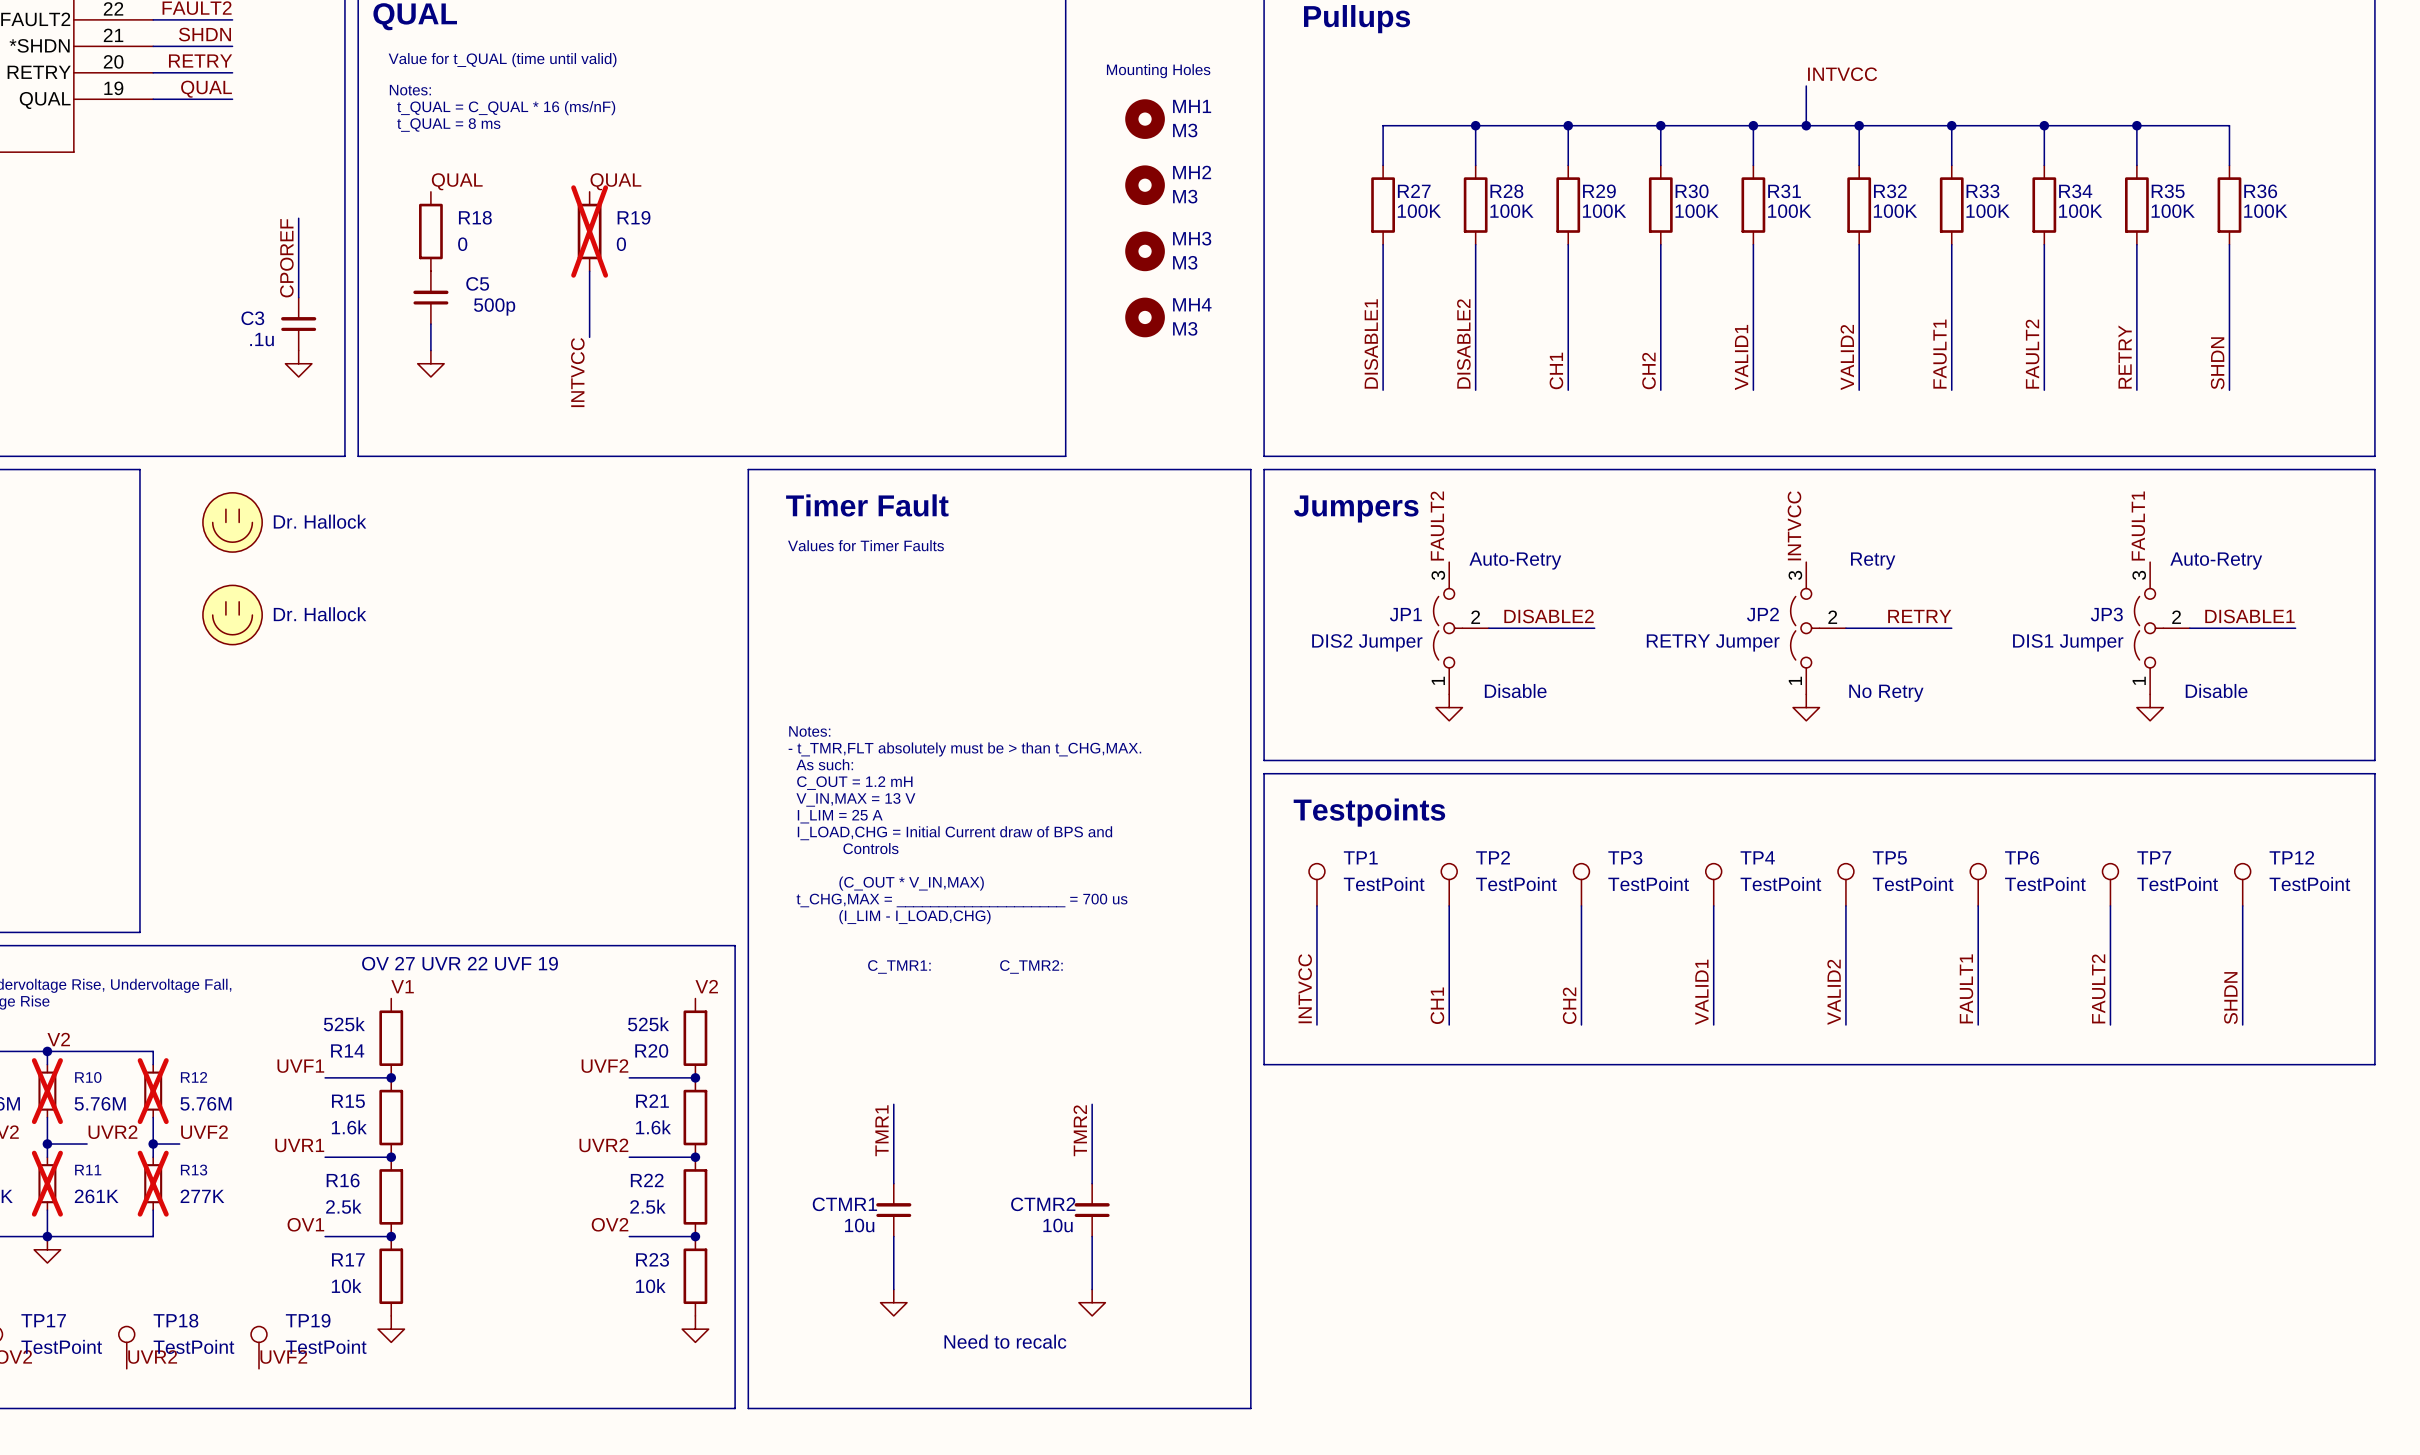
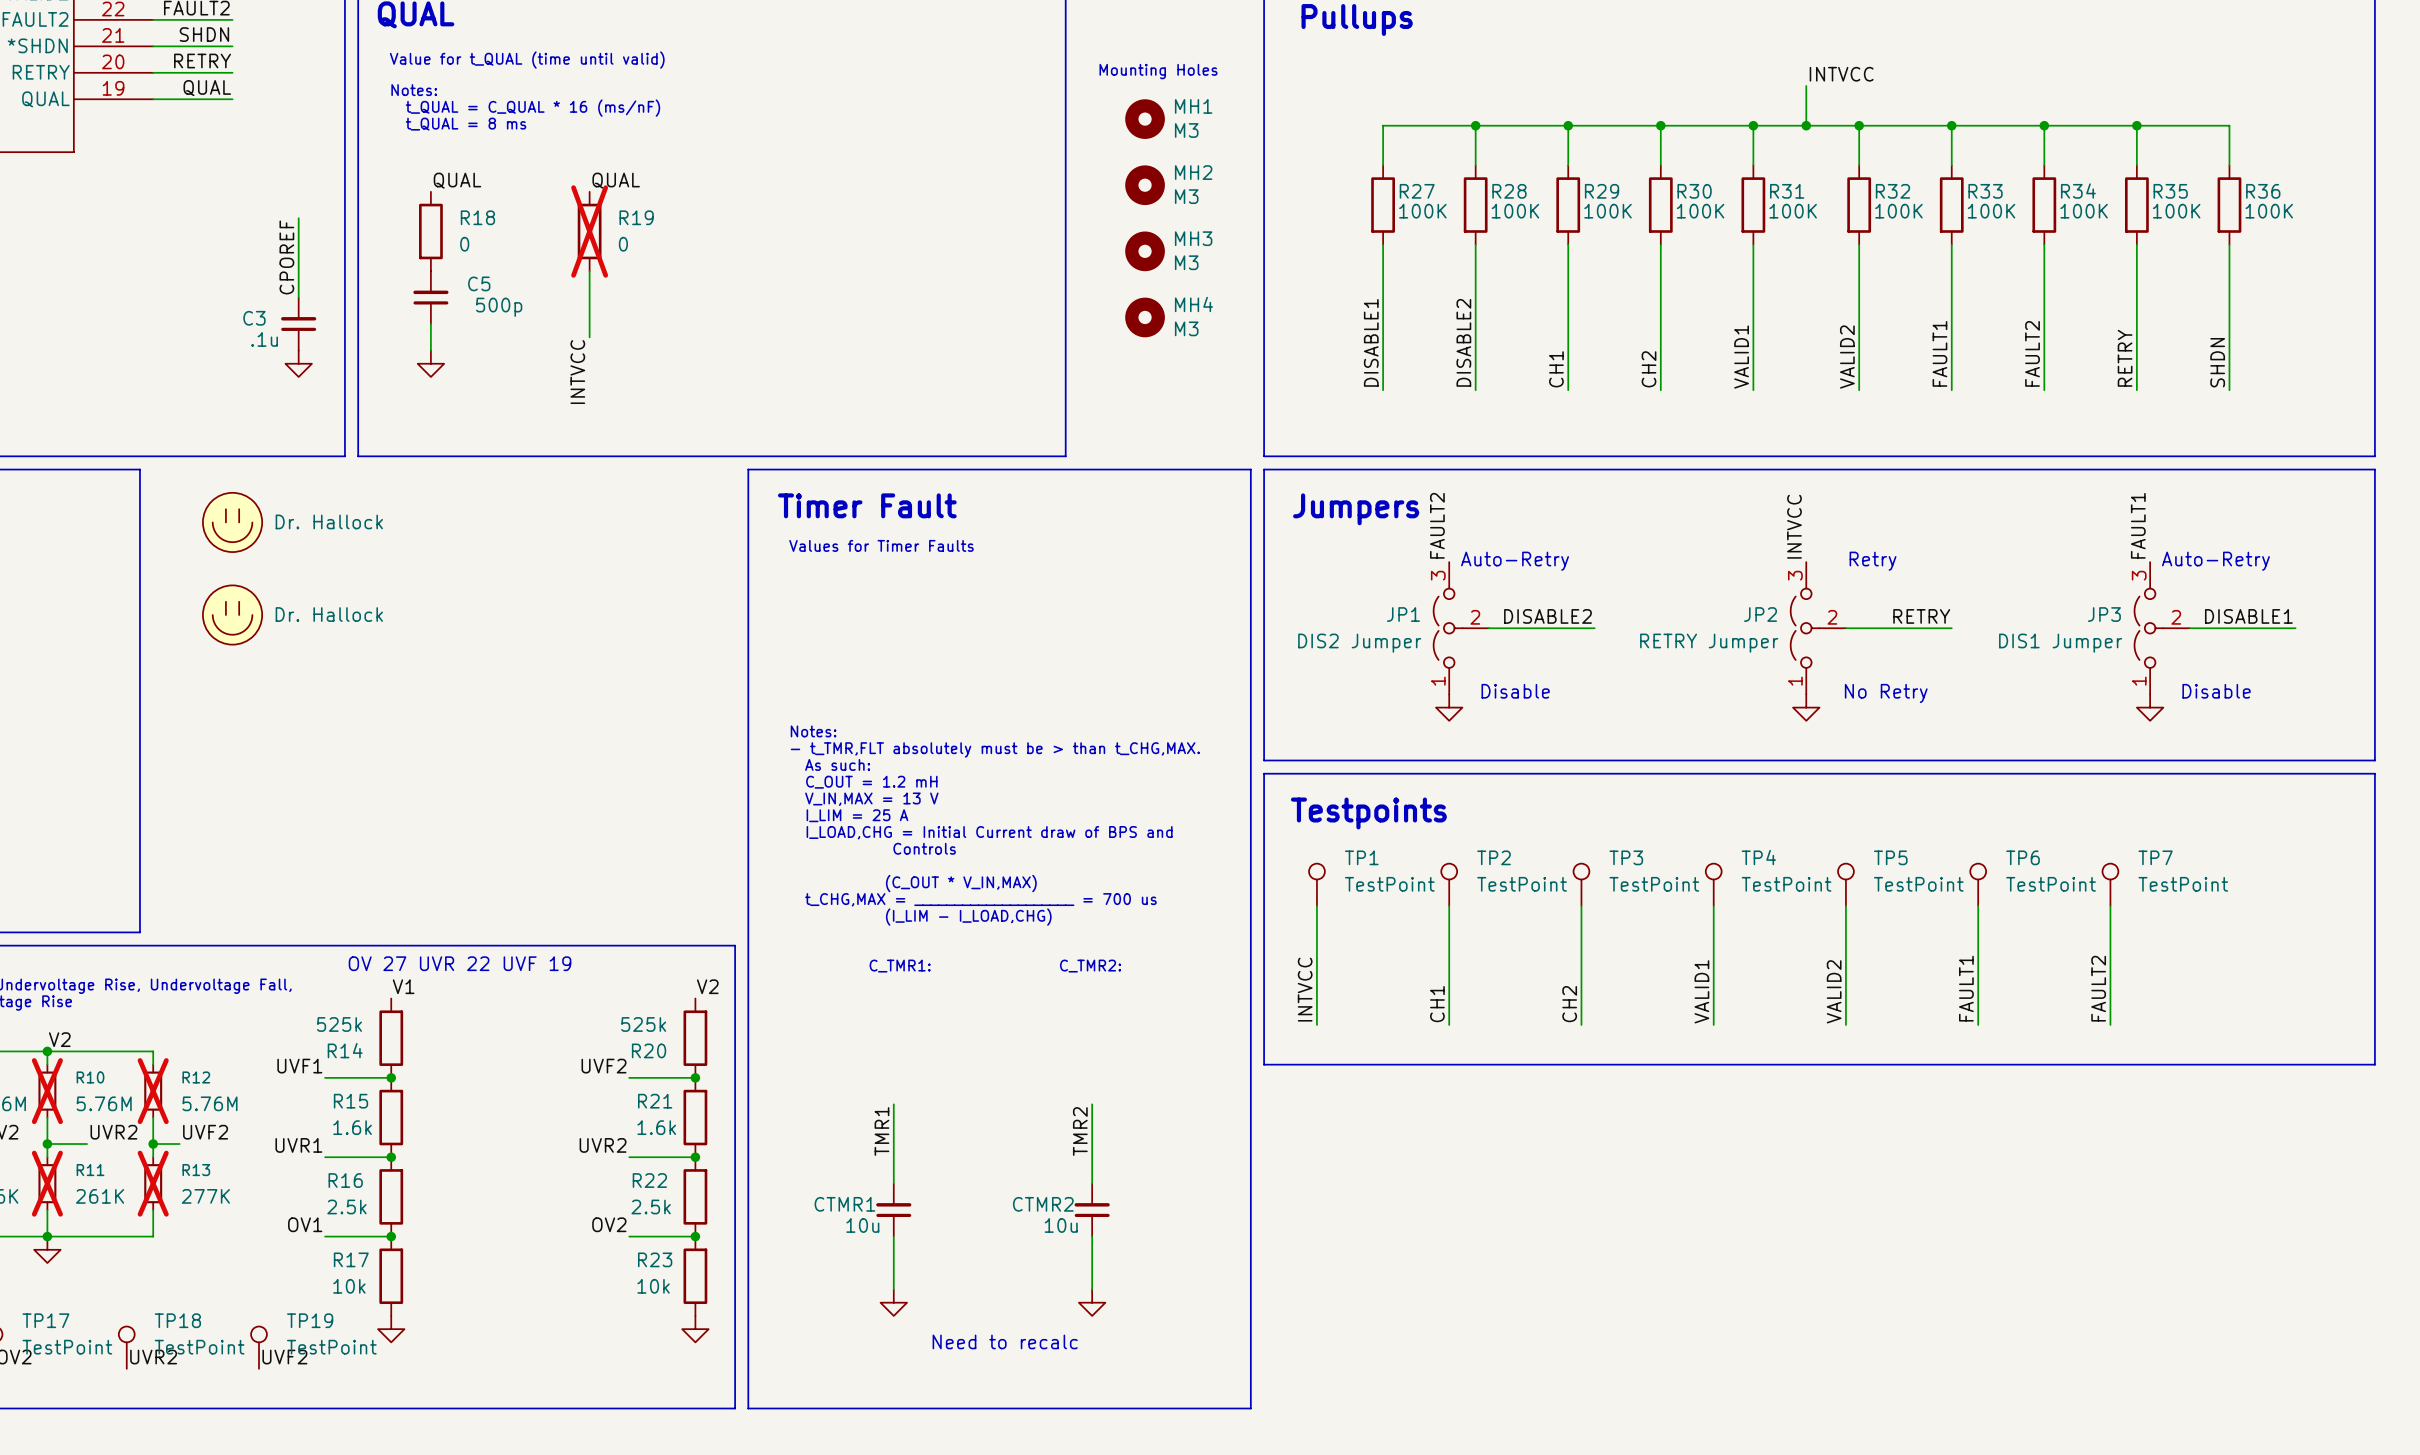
TP12: TestPoint (2242, 884) -> none
wire: (2242, 905) (2242, 1024) -> none
label: SHDN (2230, 998) -> none

